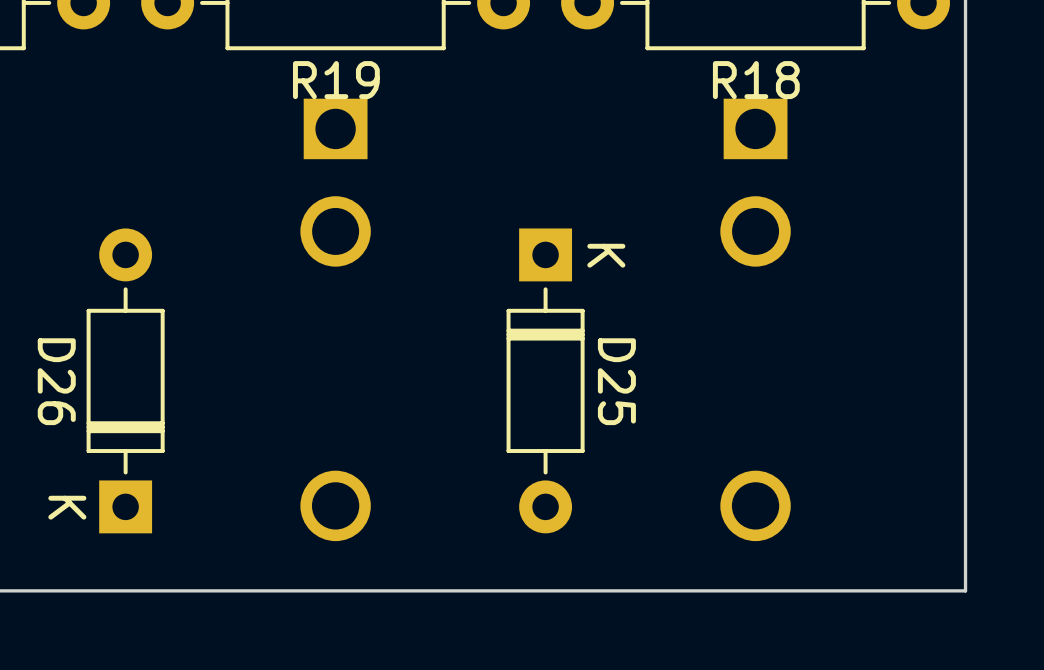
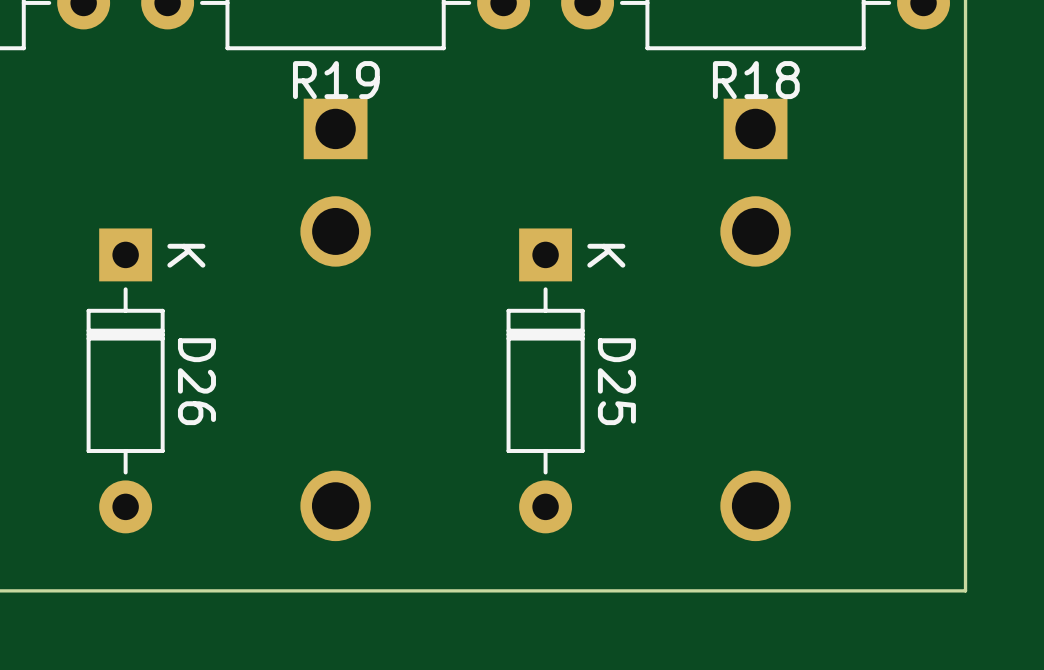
D26 rotation: 0° (125, 380) -> 180° (125, 380)

